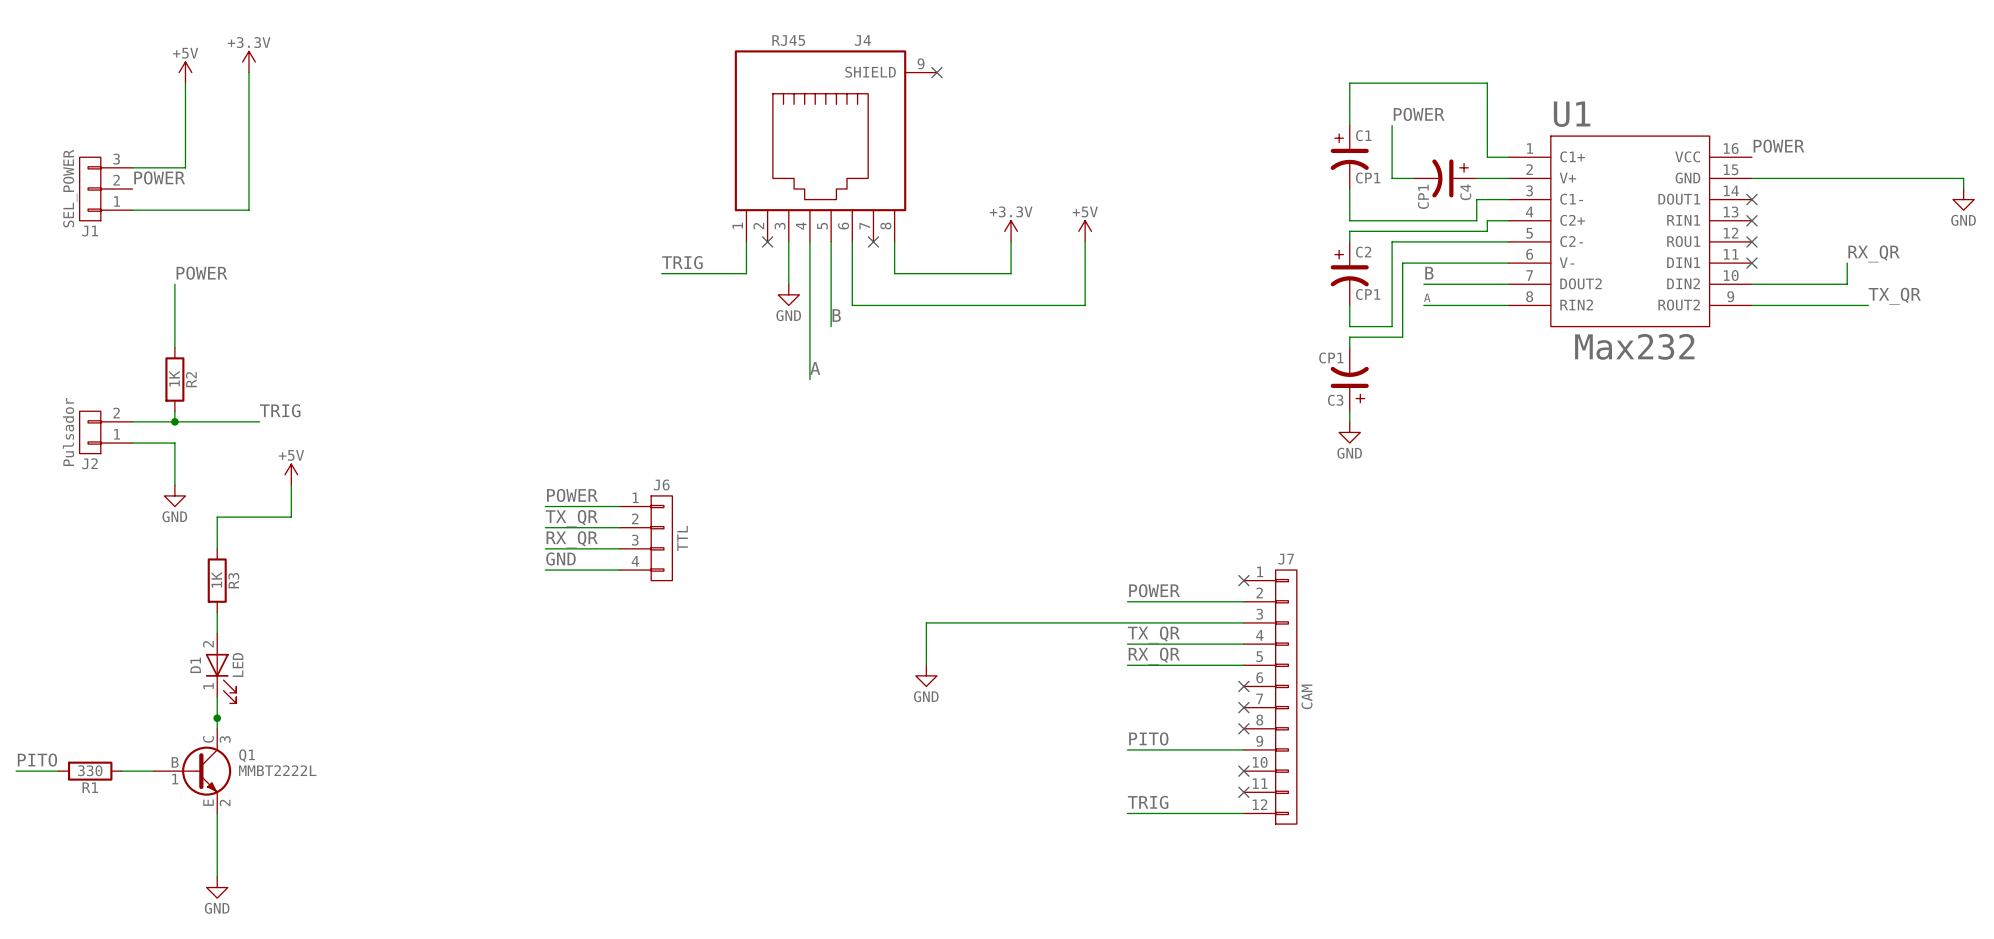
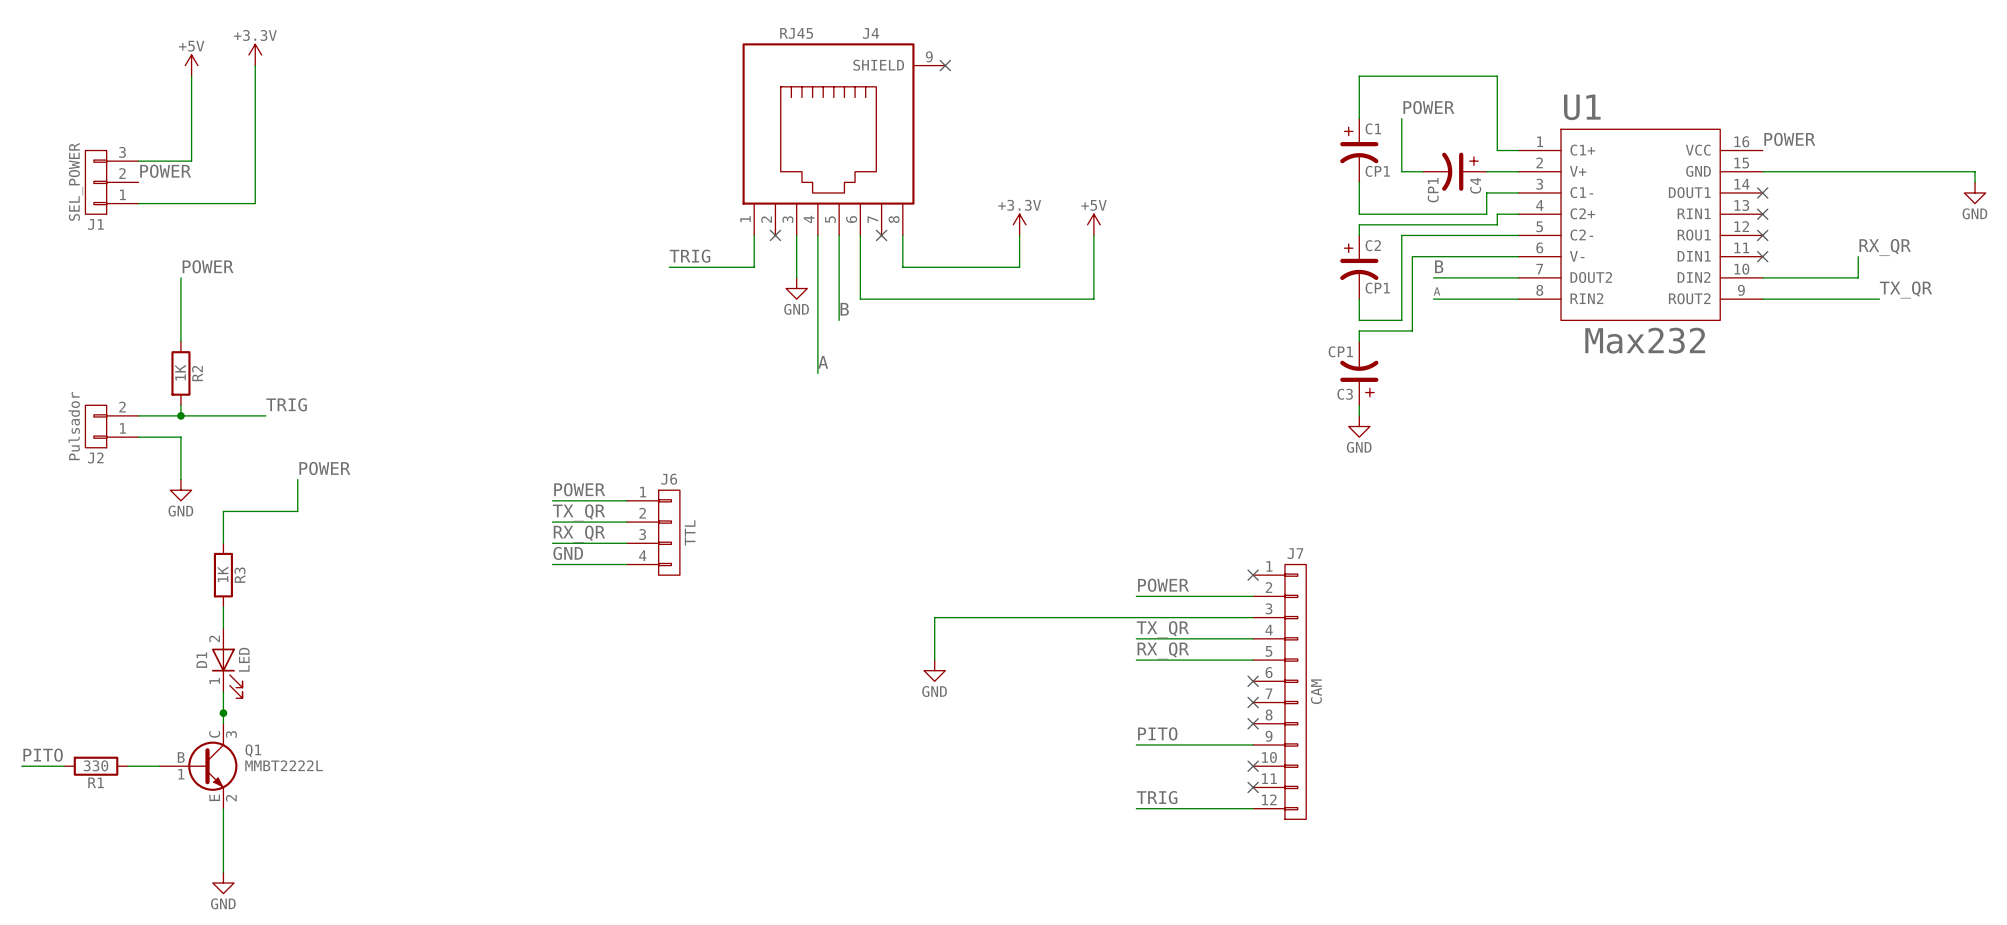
power symbol: +5V (291, 474) -> none
label: none -> POWER (324, 468)

